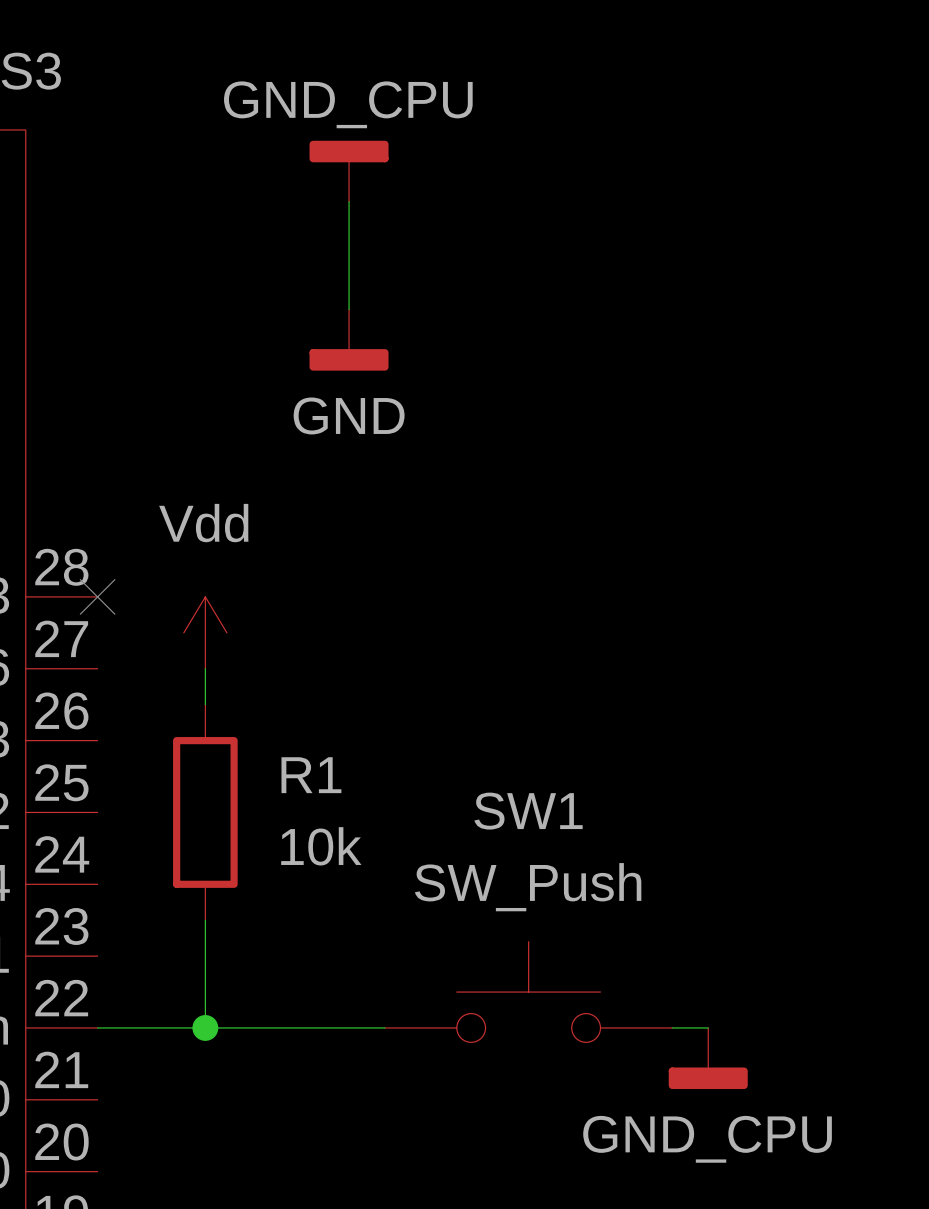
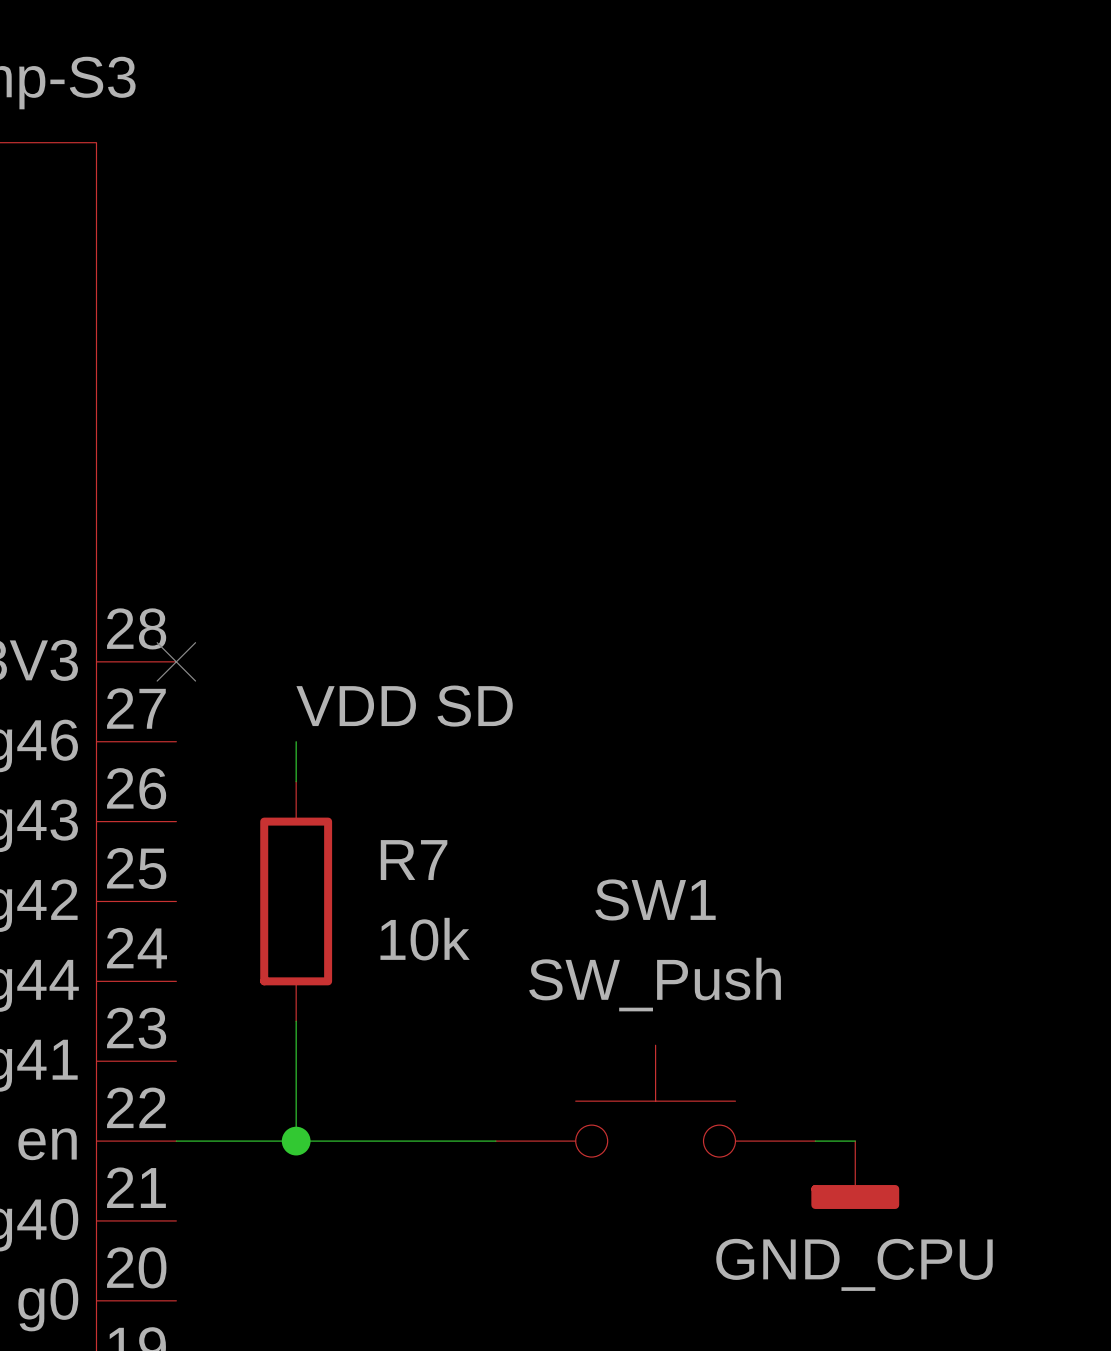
power symbol: GND_CPU (349, 171) -> none
wire: (349, 201) (349, 309) -> none
power symbol: GND (349, 340) -> none
power symbol: Vdd (205, 632) -> none
label: none -> VDD SD (404, 706)
R1 name: R1 (311, 775) -> R7 (414, 860)

